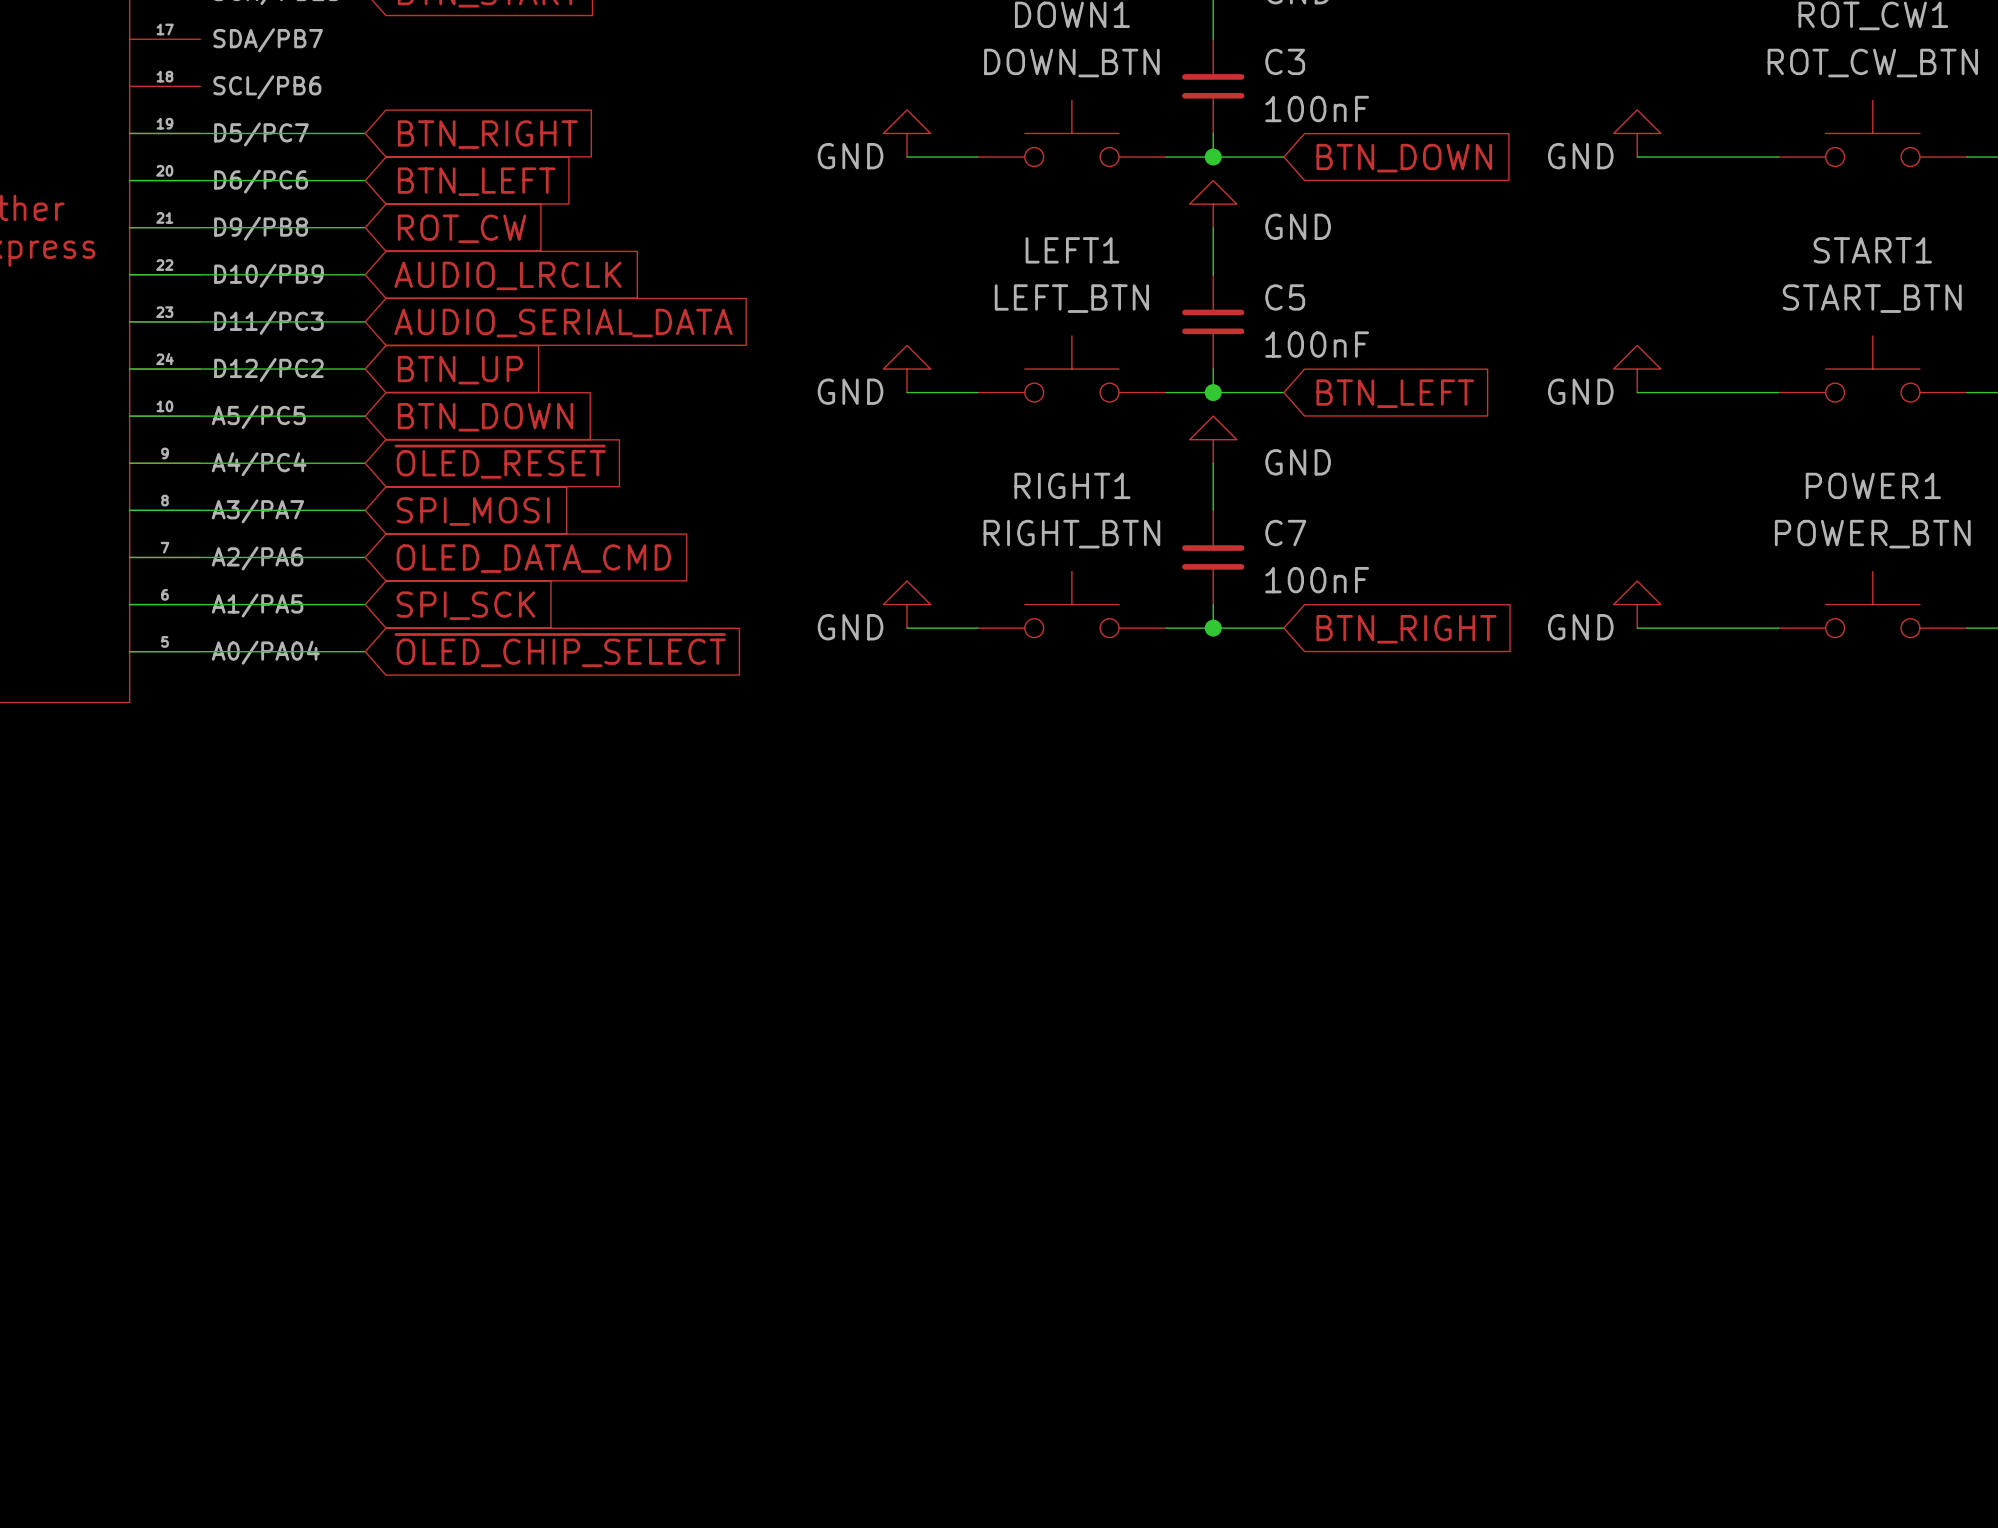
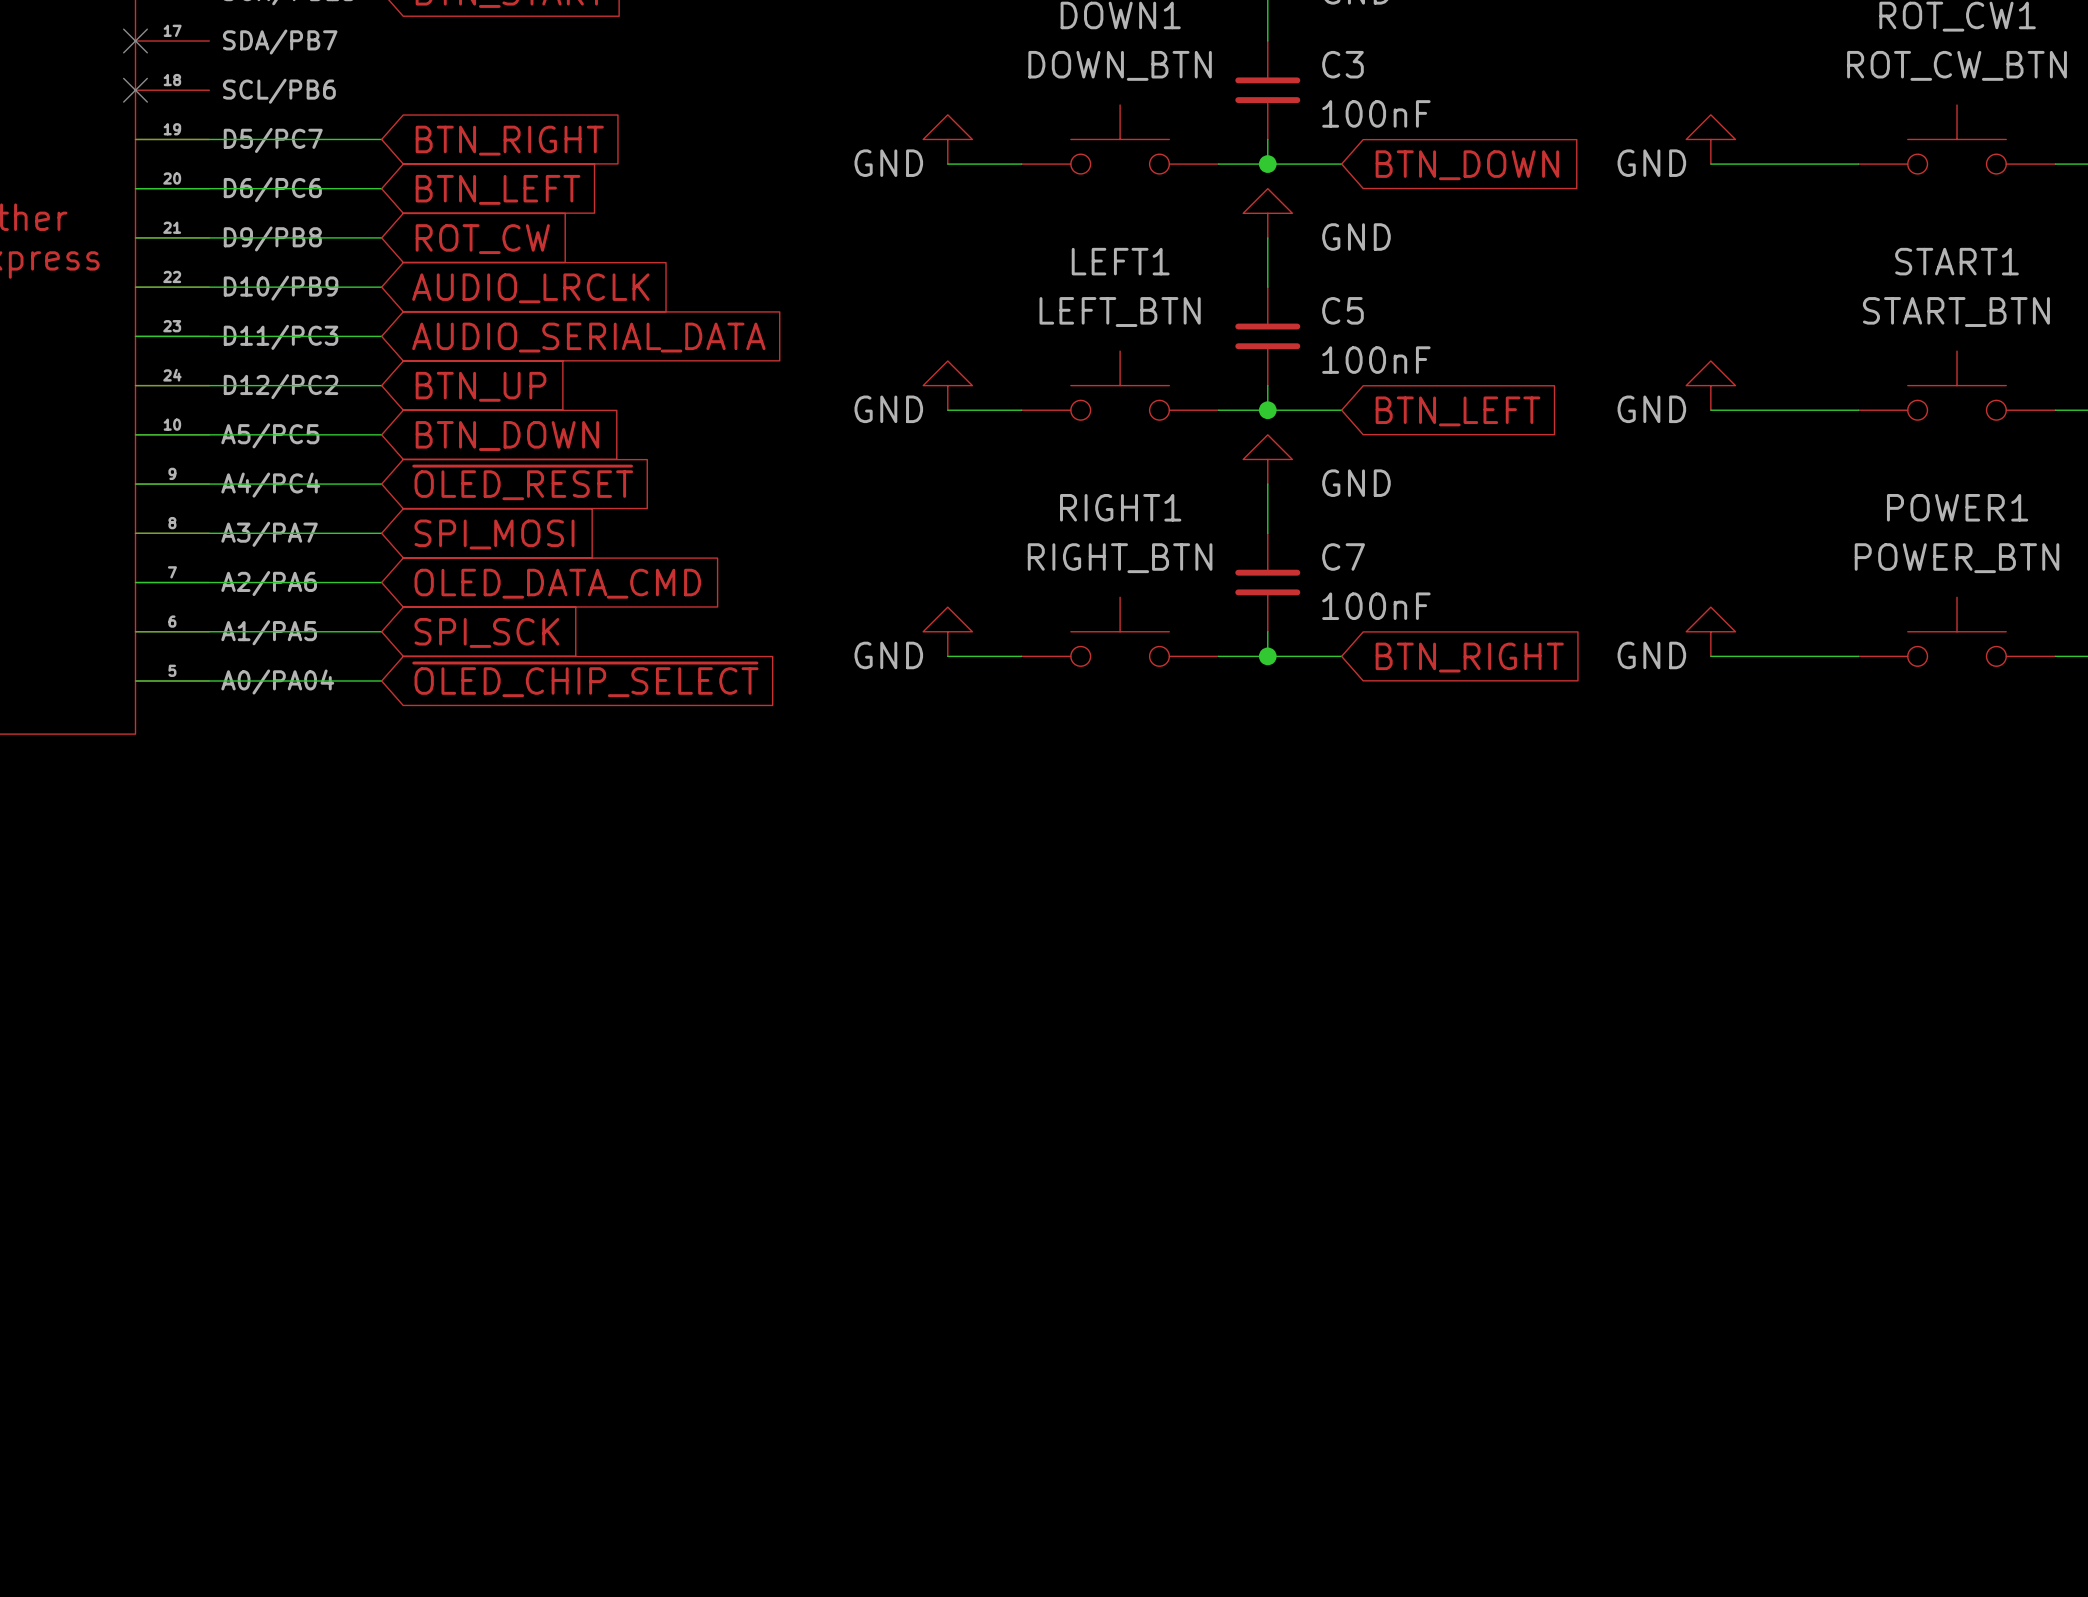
no-connect mark: none -> (135, 41)
no-connect mark: none -> (135, 90)

